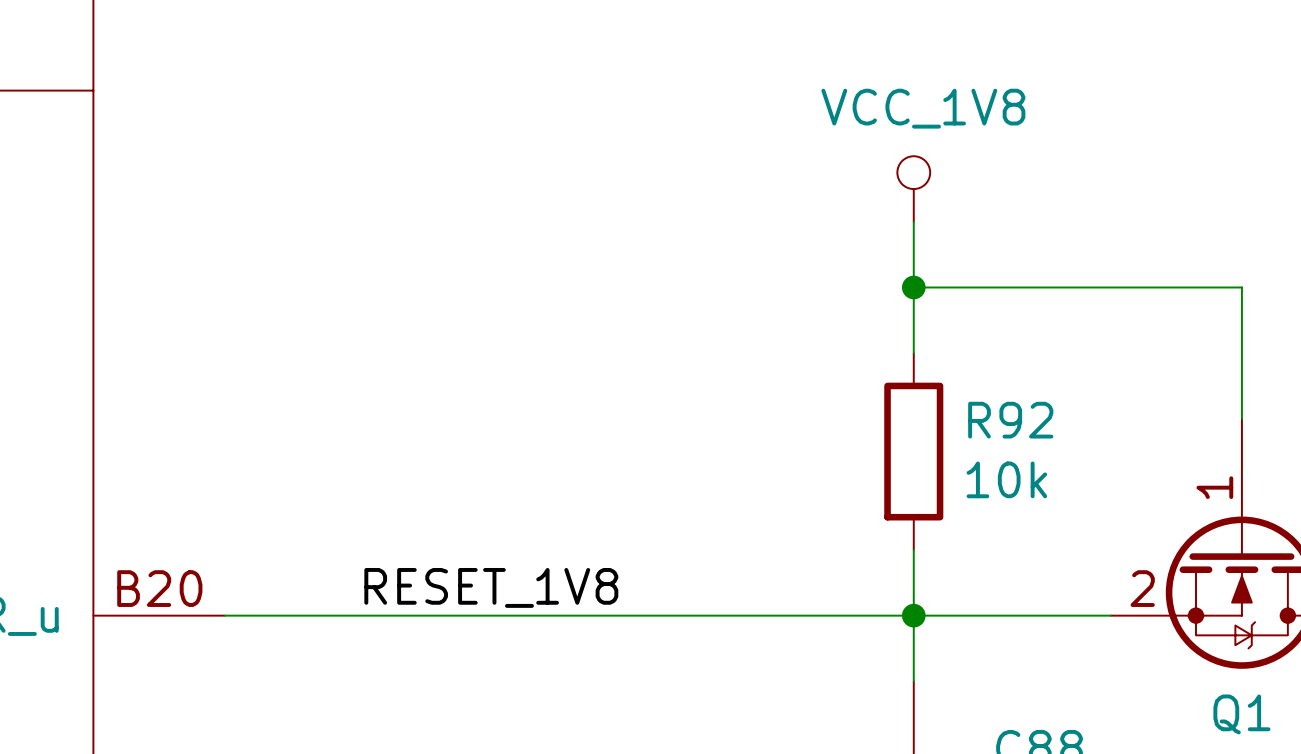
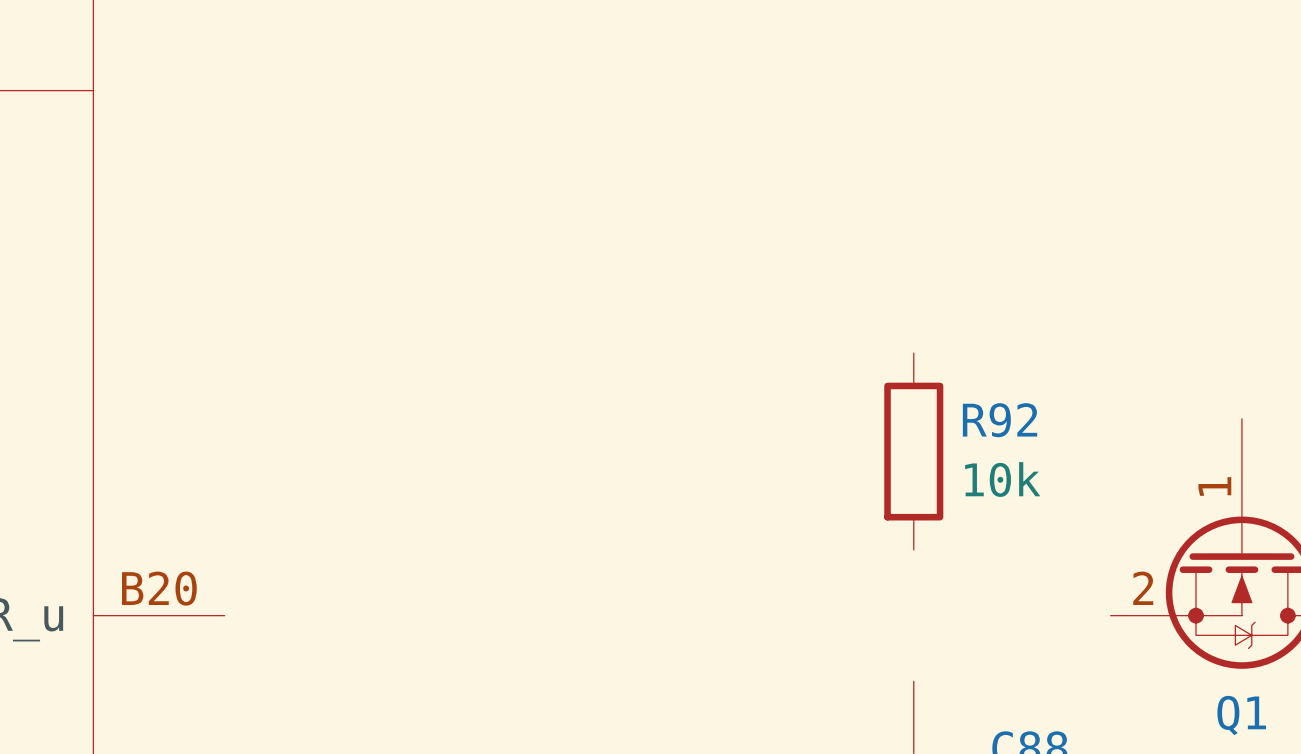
power symbol: VCC_1V8 (913, 189) -> none
wire: (913, 221) (913, 353) -> none
wire: (913, 287) (1241, 287) (1241, 418) -> none
junction: (913, 287) -> none
wire: (913, 550) (913, 681) -> none
label: RESET_1V8 (491, 587) -> none
wire: (224, 615) (1110, 615) -> none
junction: (913, 615) -> none

